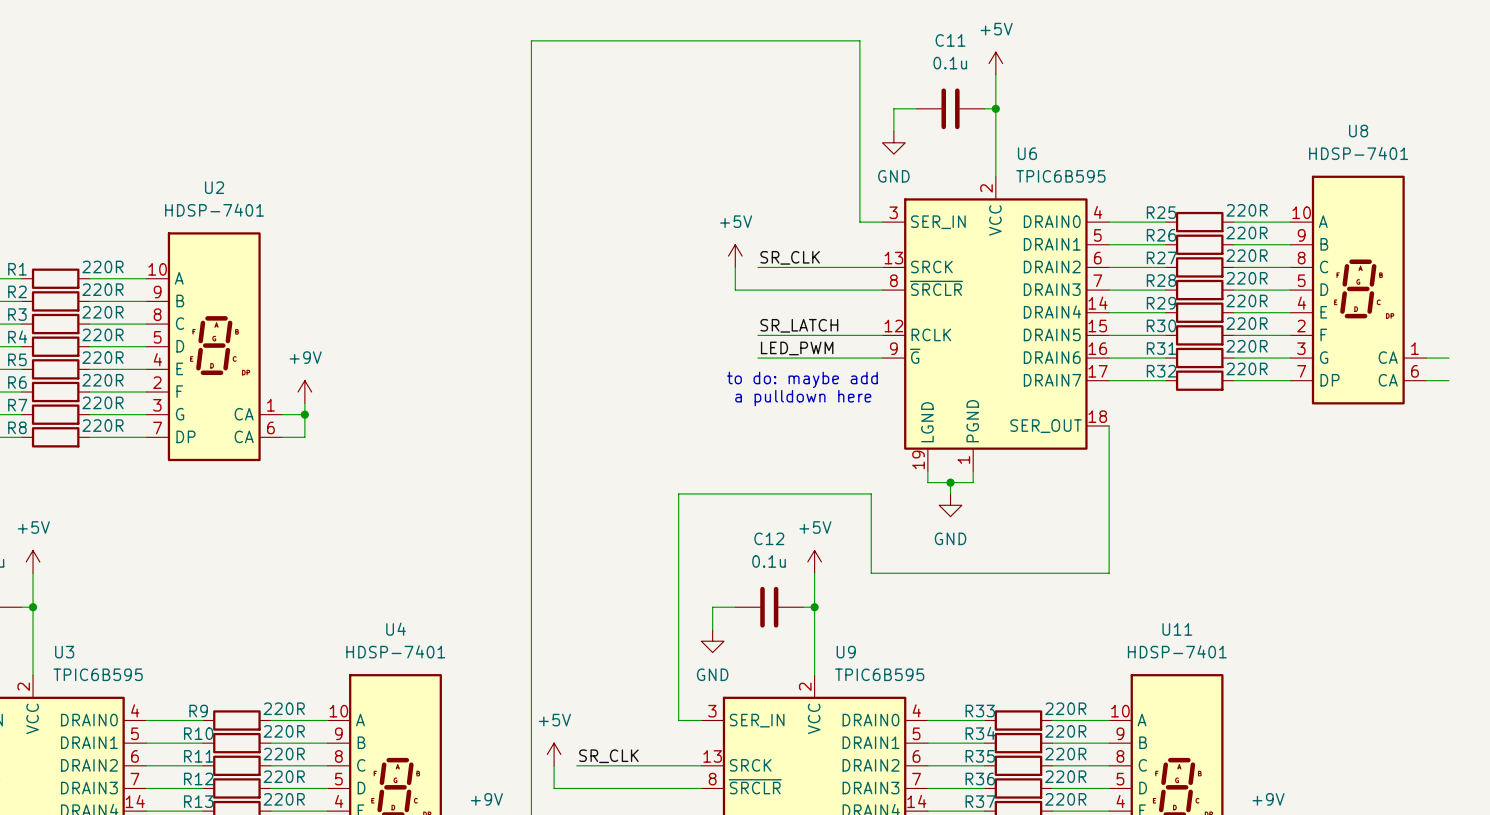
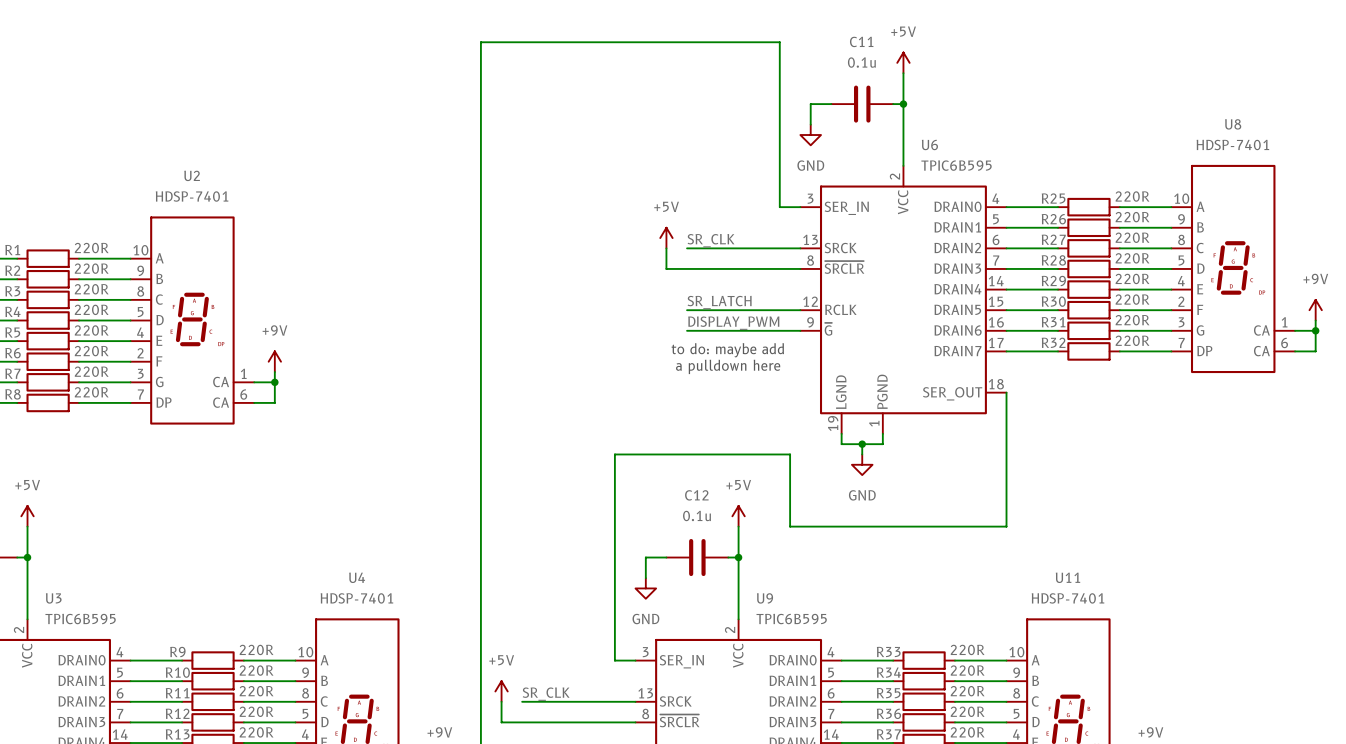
power symbol: none -> +9V (1315, 310)
wire: none -> (1315, 320) (1315, 351)
label: LED_PWM (797, 348) -> DISPLAY_PWM (733, 323)
junction: none -> (1315, 330)

